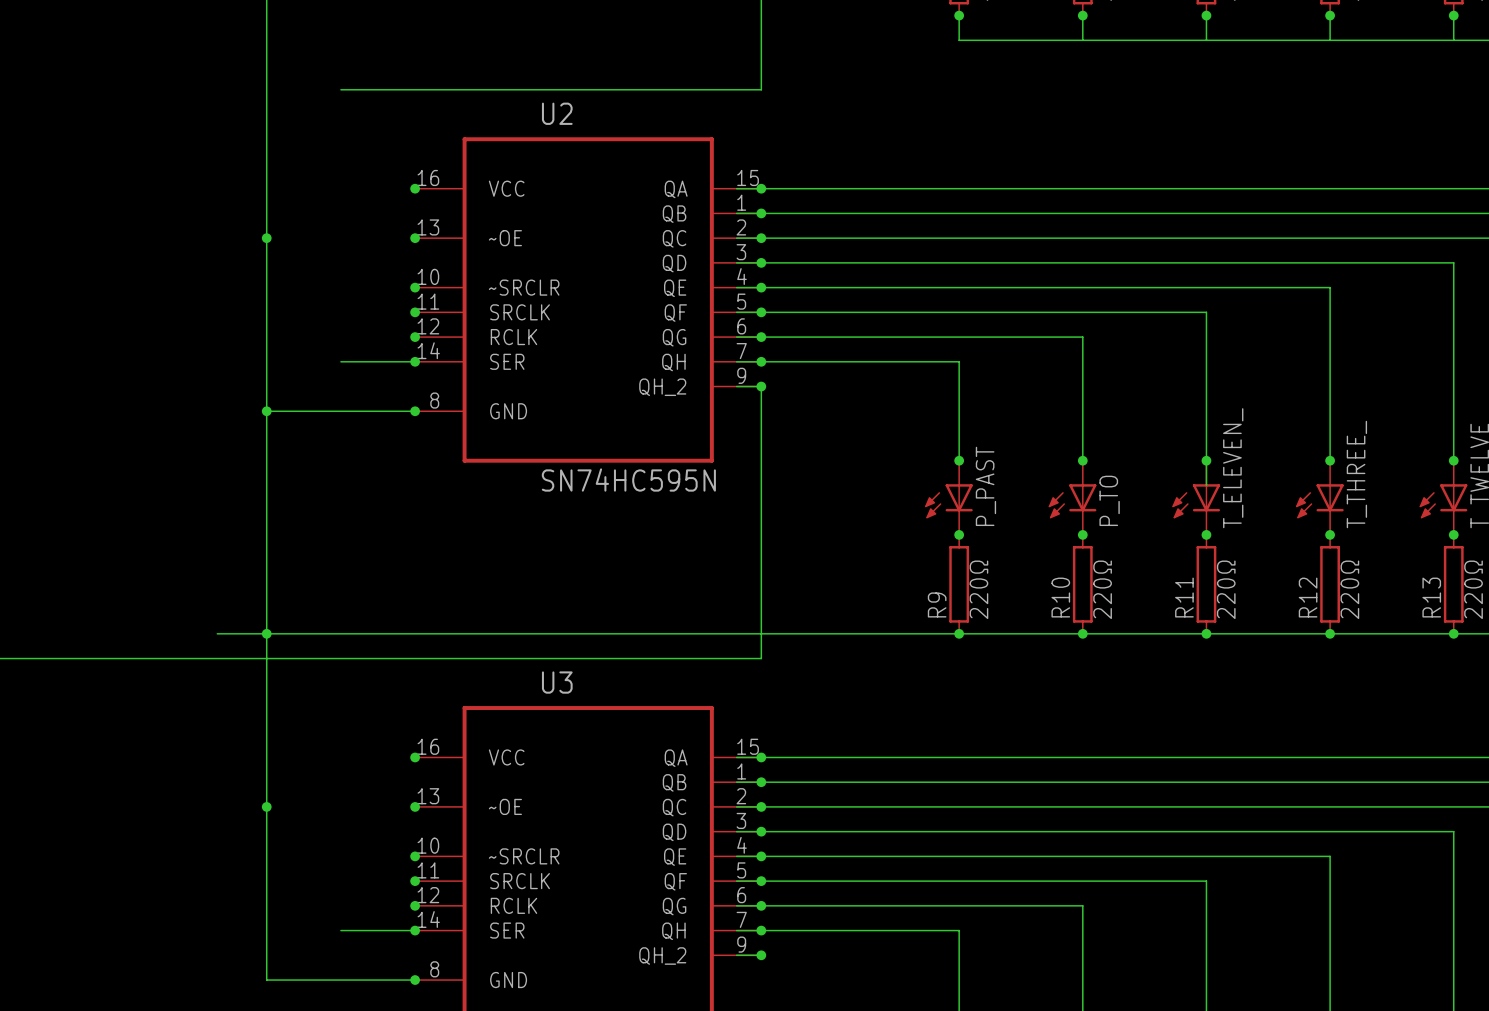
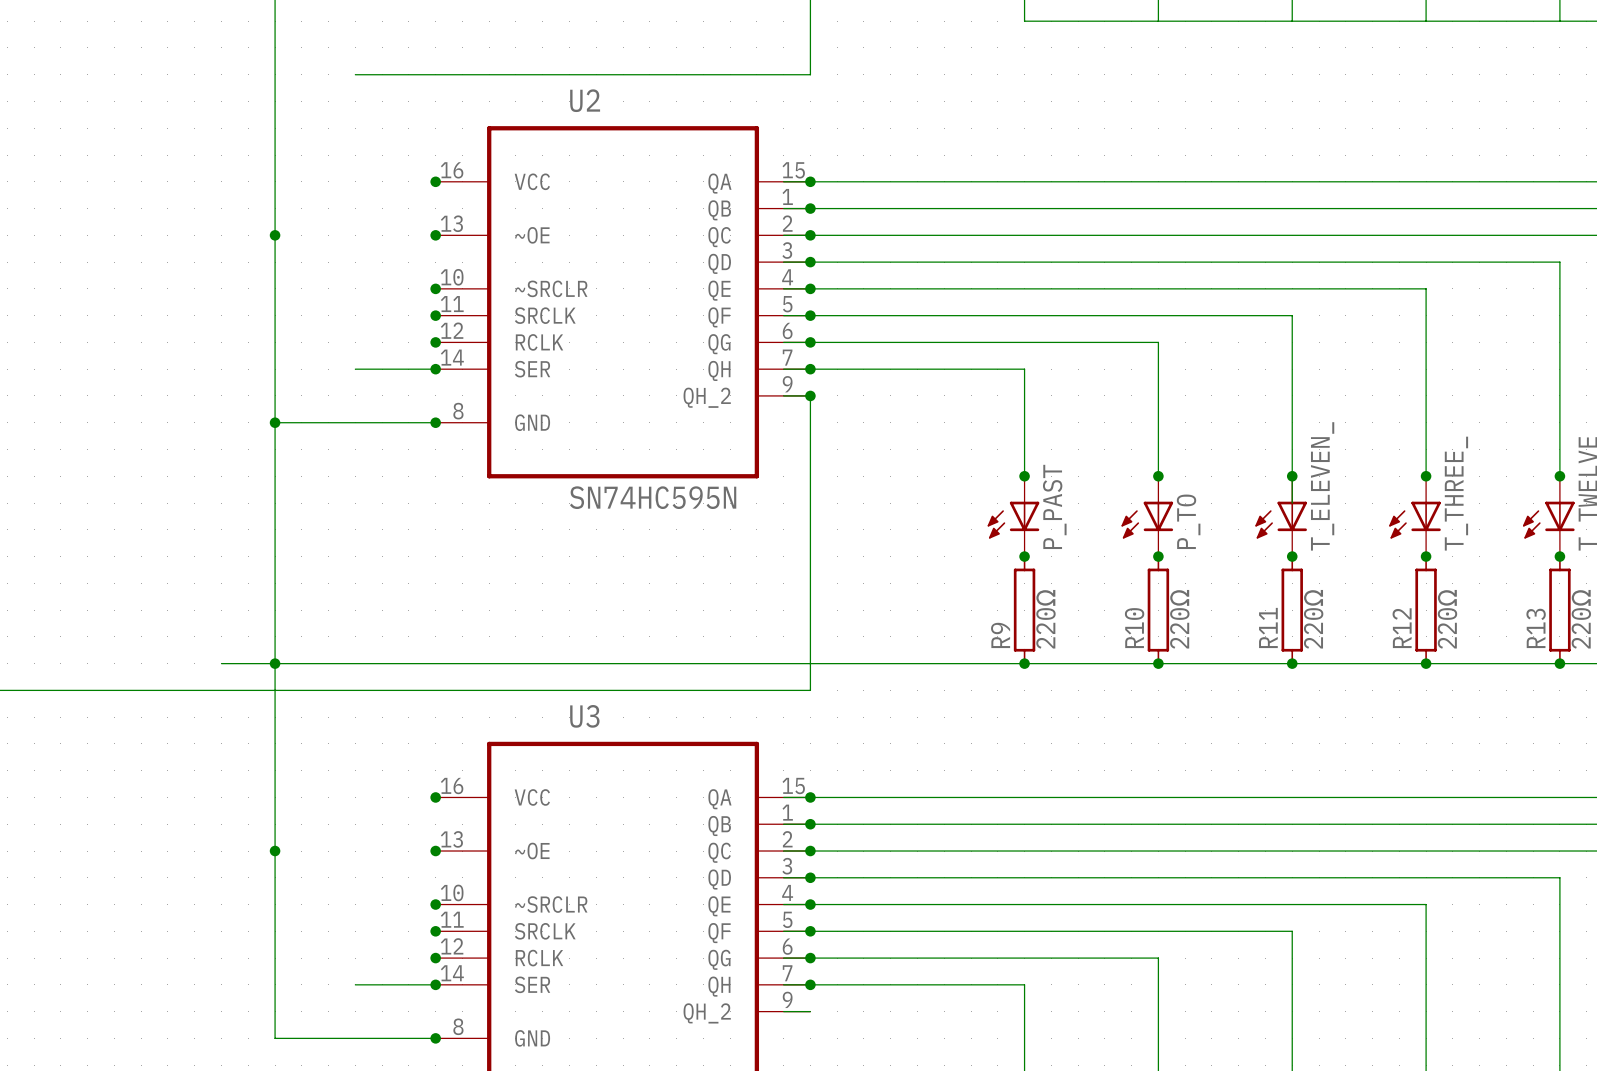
junction: (761, 955) -> none

